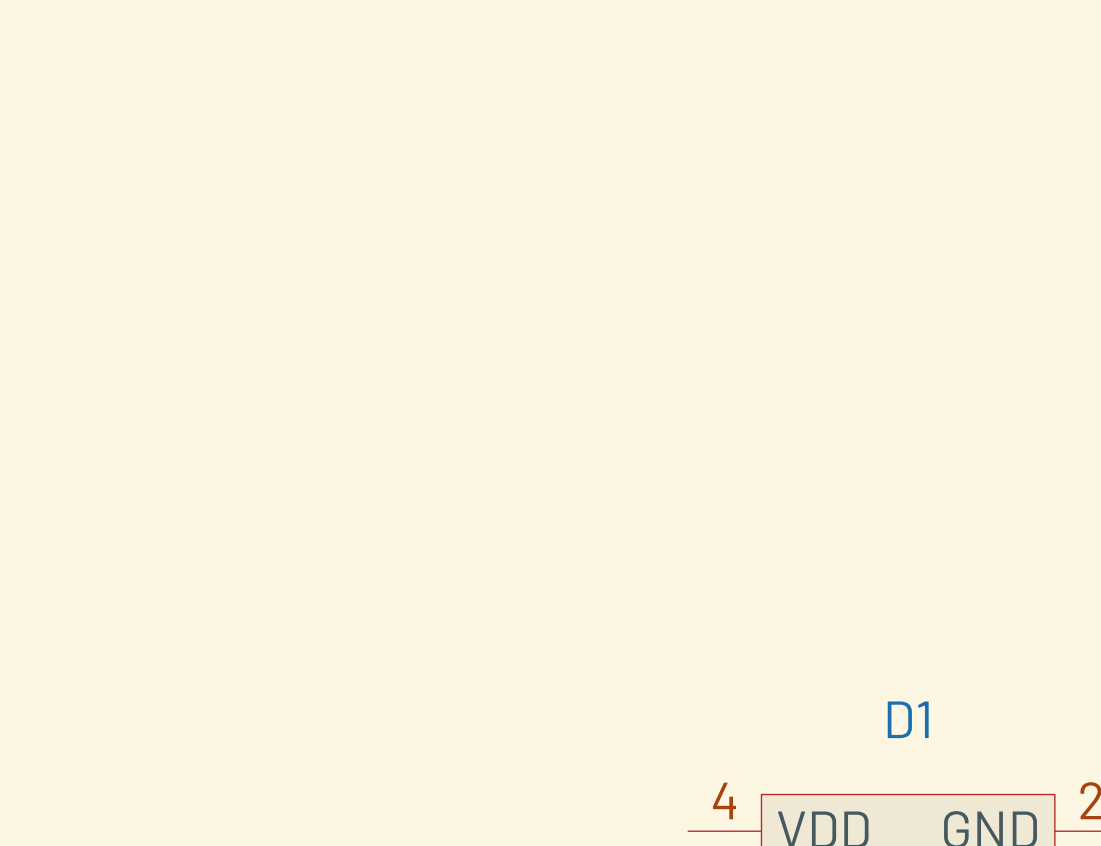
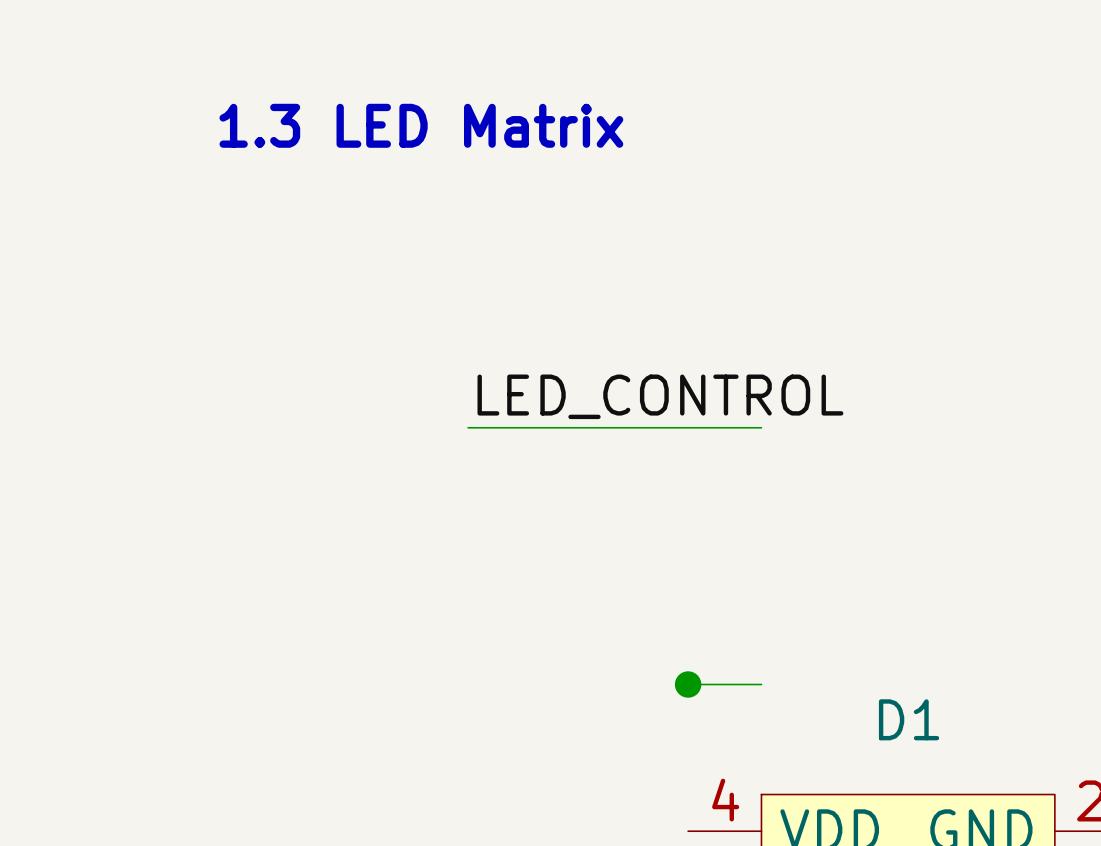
text: none -> 1.3 LED Matrix (421, 125)
label: none -> LED_CONTROL (660, 396)
wire: none -> (468, 427) (761, 427)
wire: none -> (688, 684) (761, 684)
junction: none -> (688, 684)

